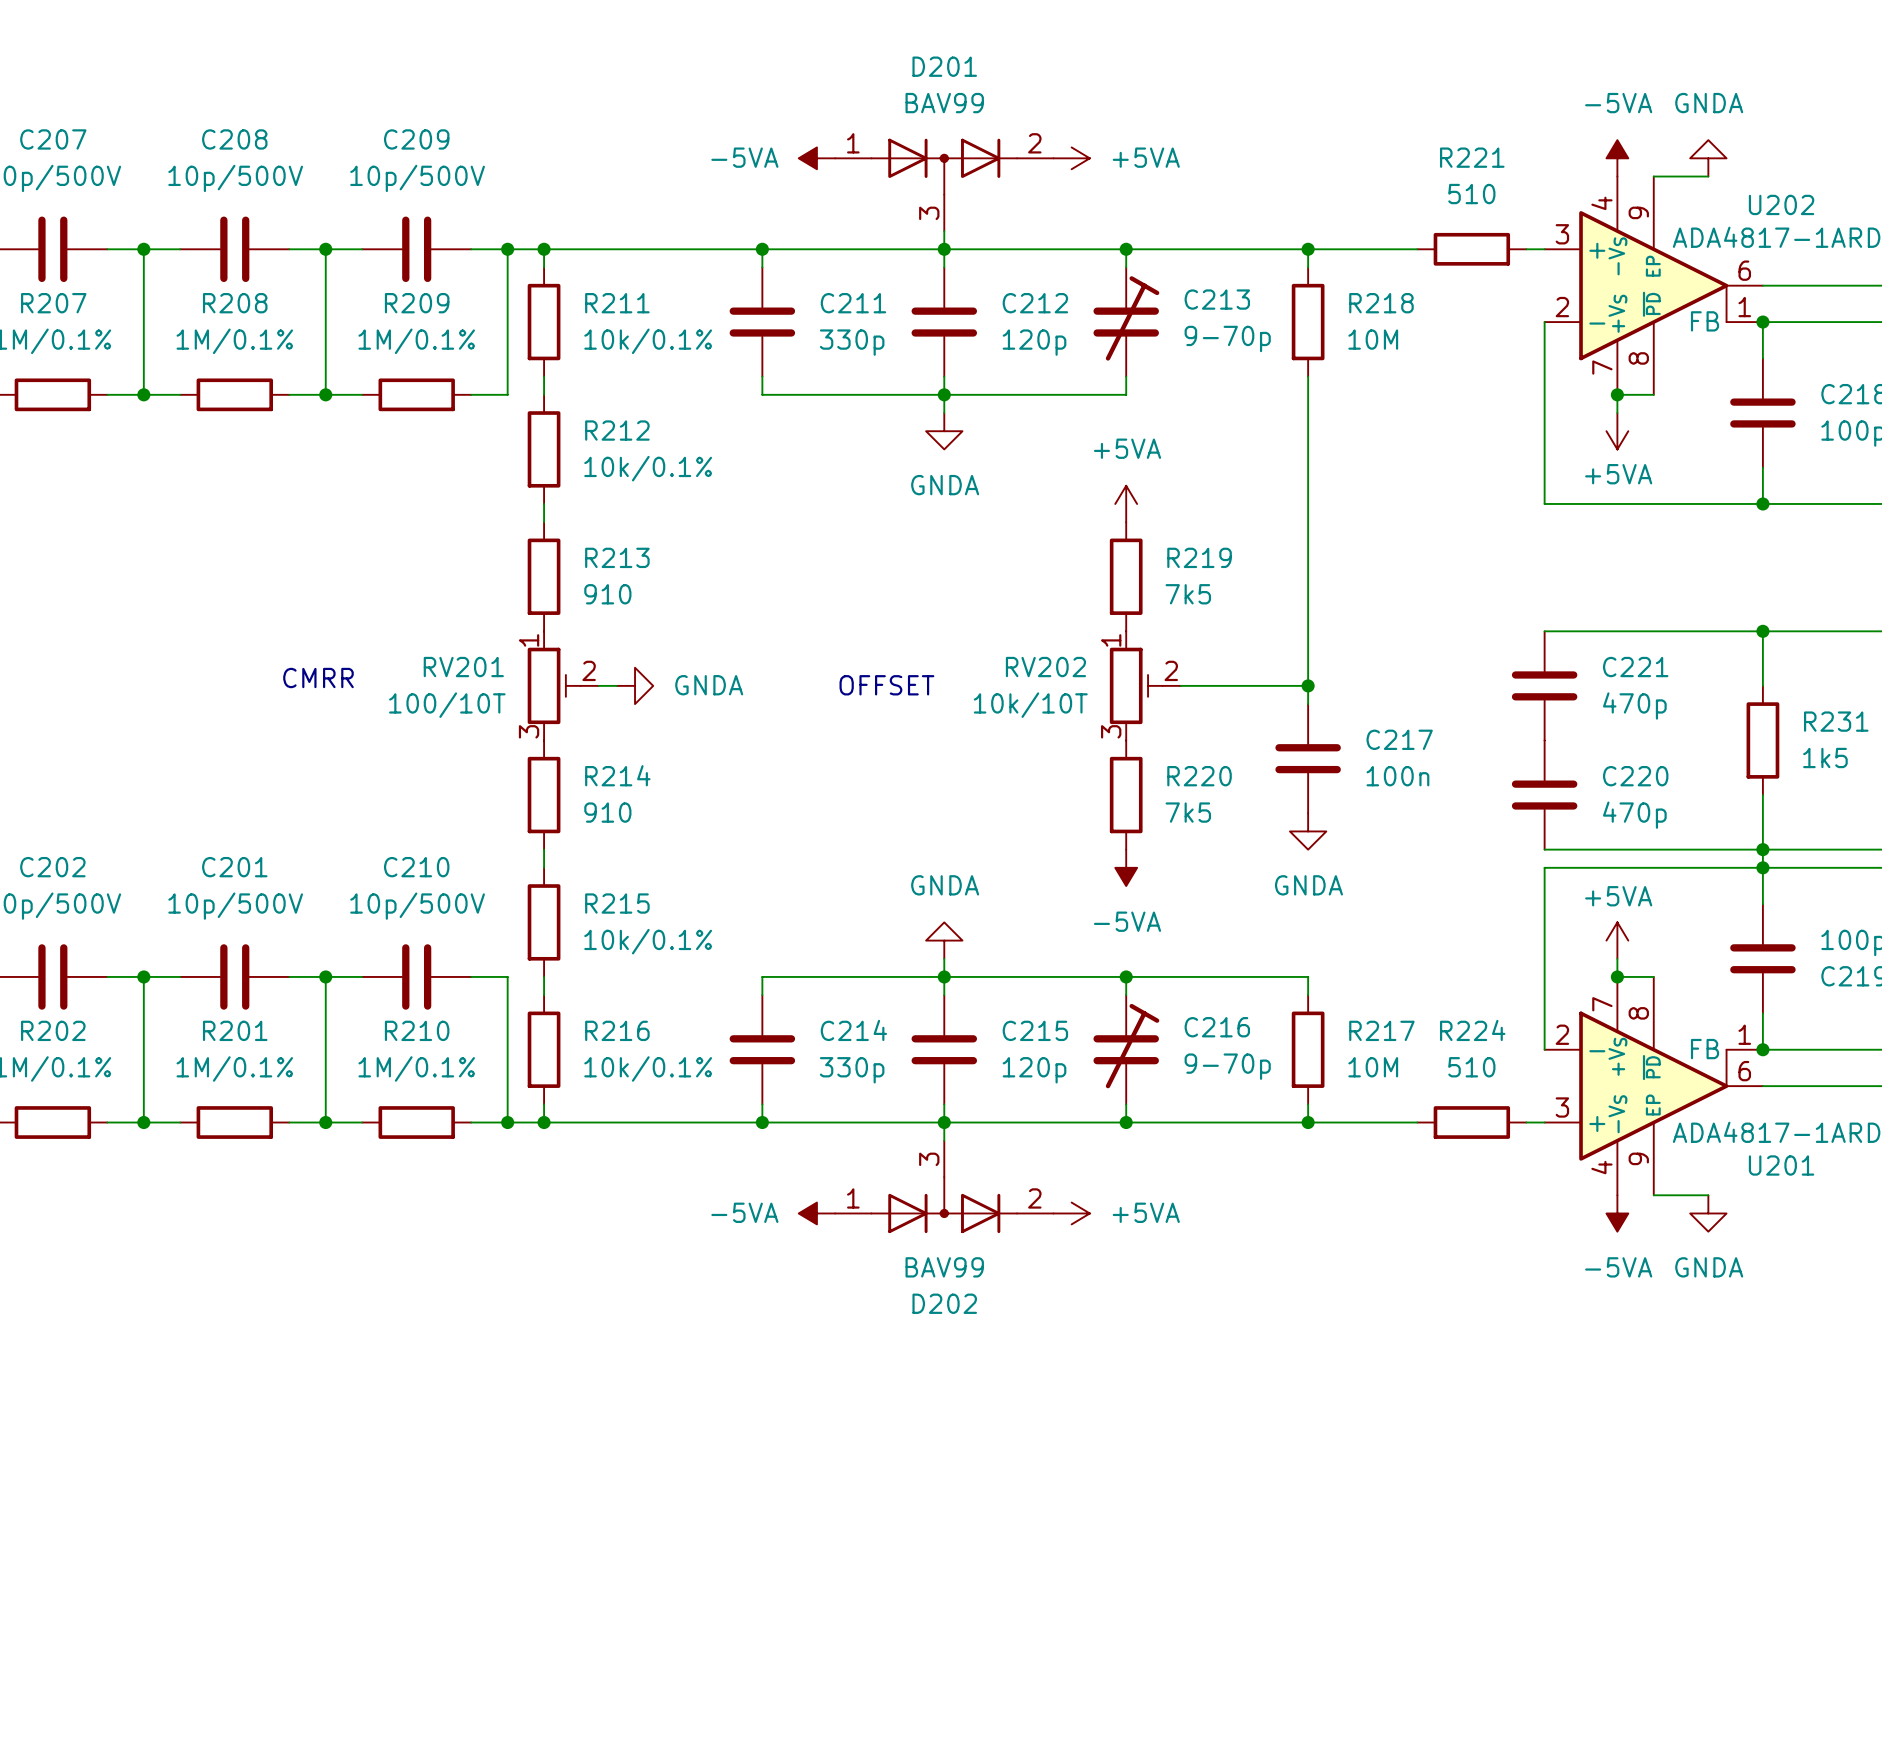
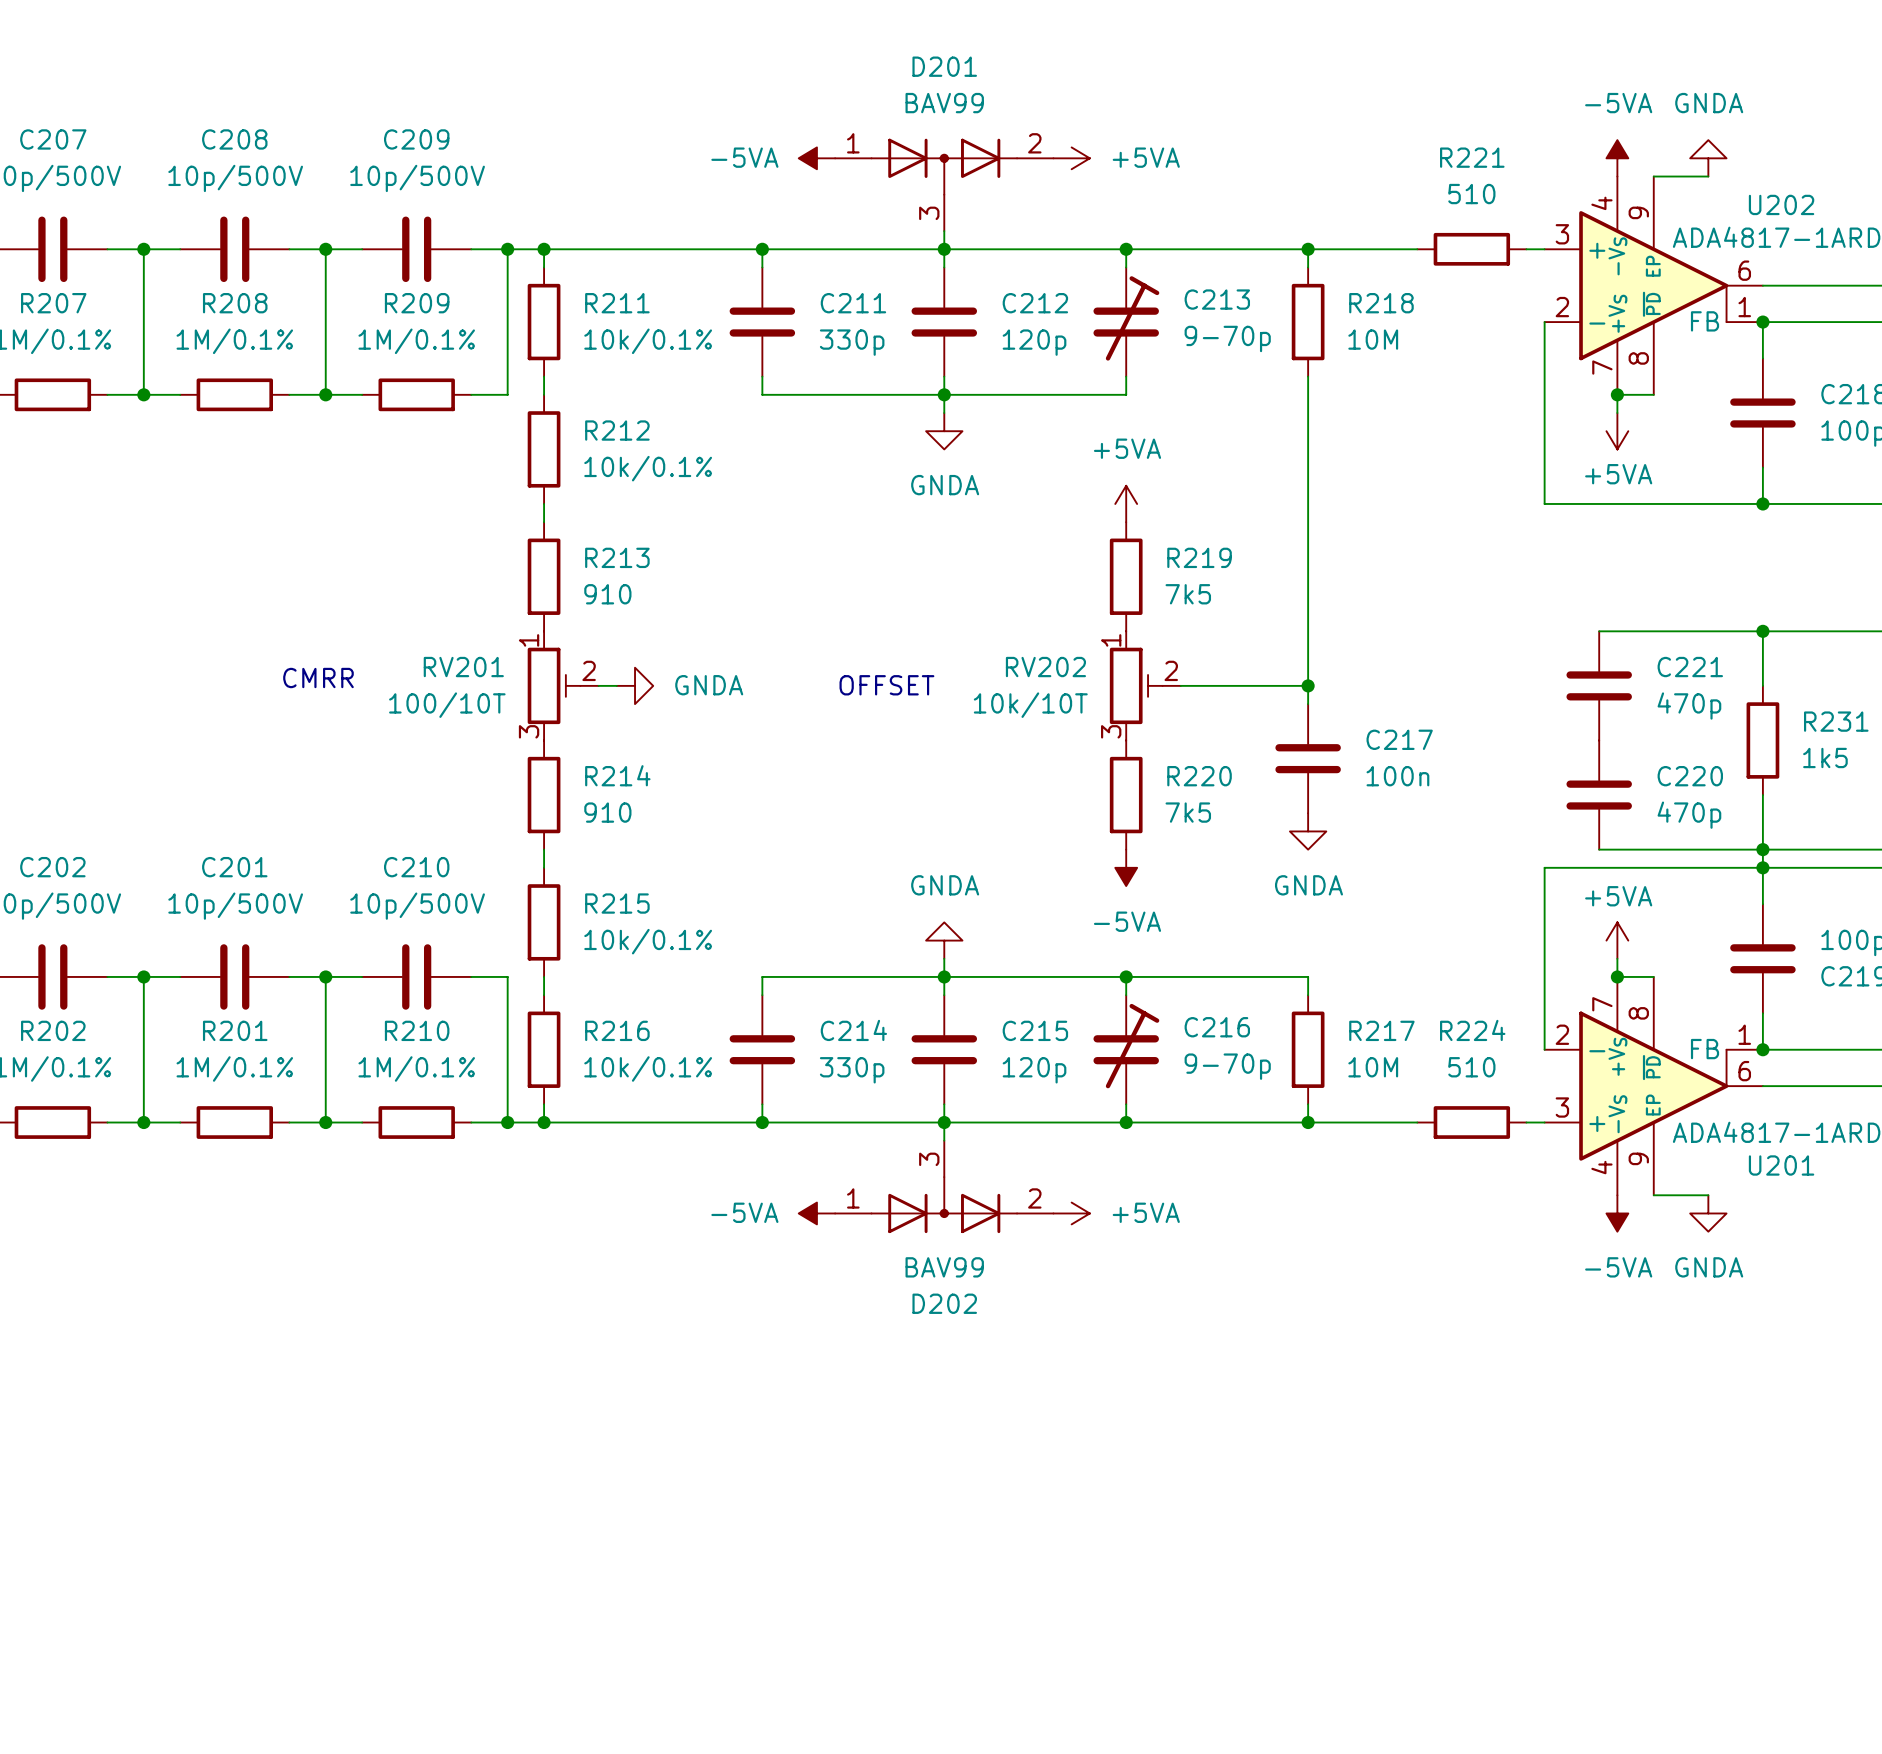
wire: (1544, 631) (1599, 631) -> none
C221 position: (1544, 685) -> (1599, 685)
C220 position: (1544, 795) -> (1599, 795)
wire: (1544, 849) (1599, 849) -> none

